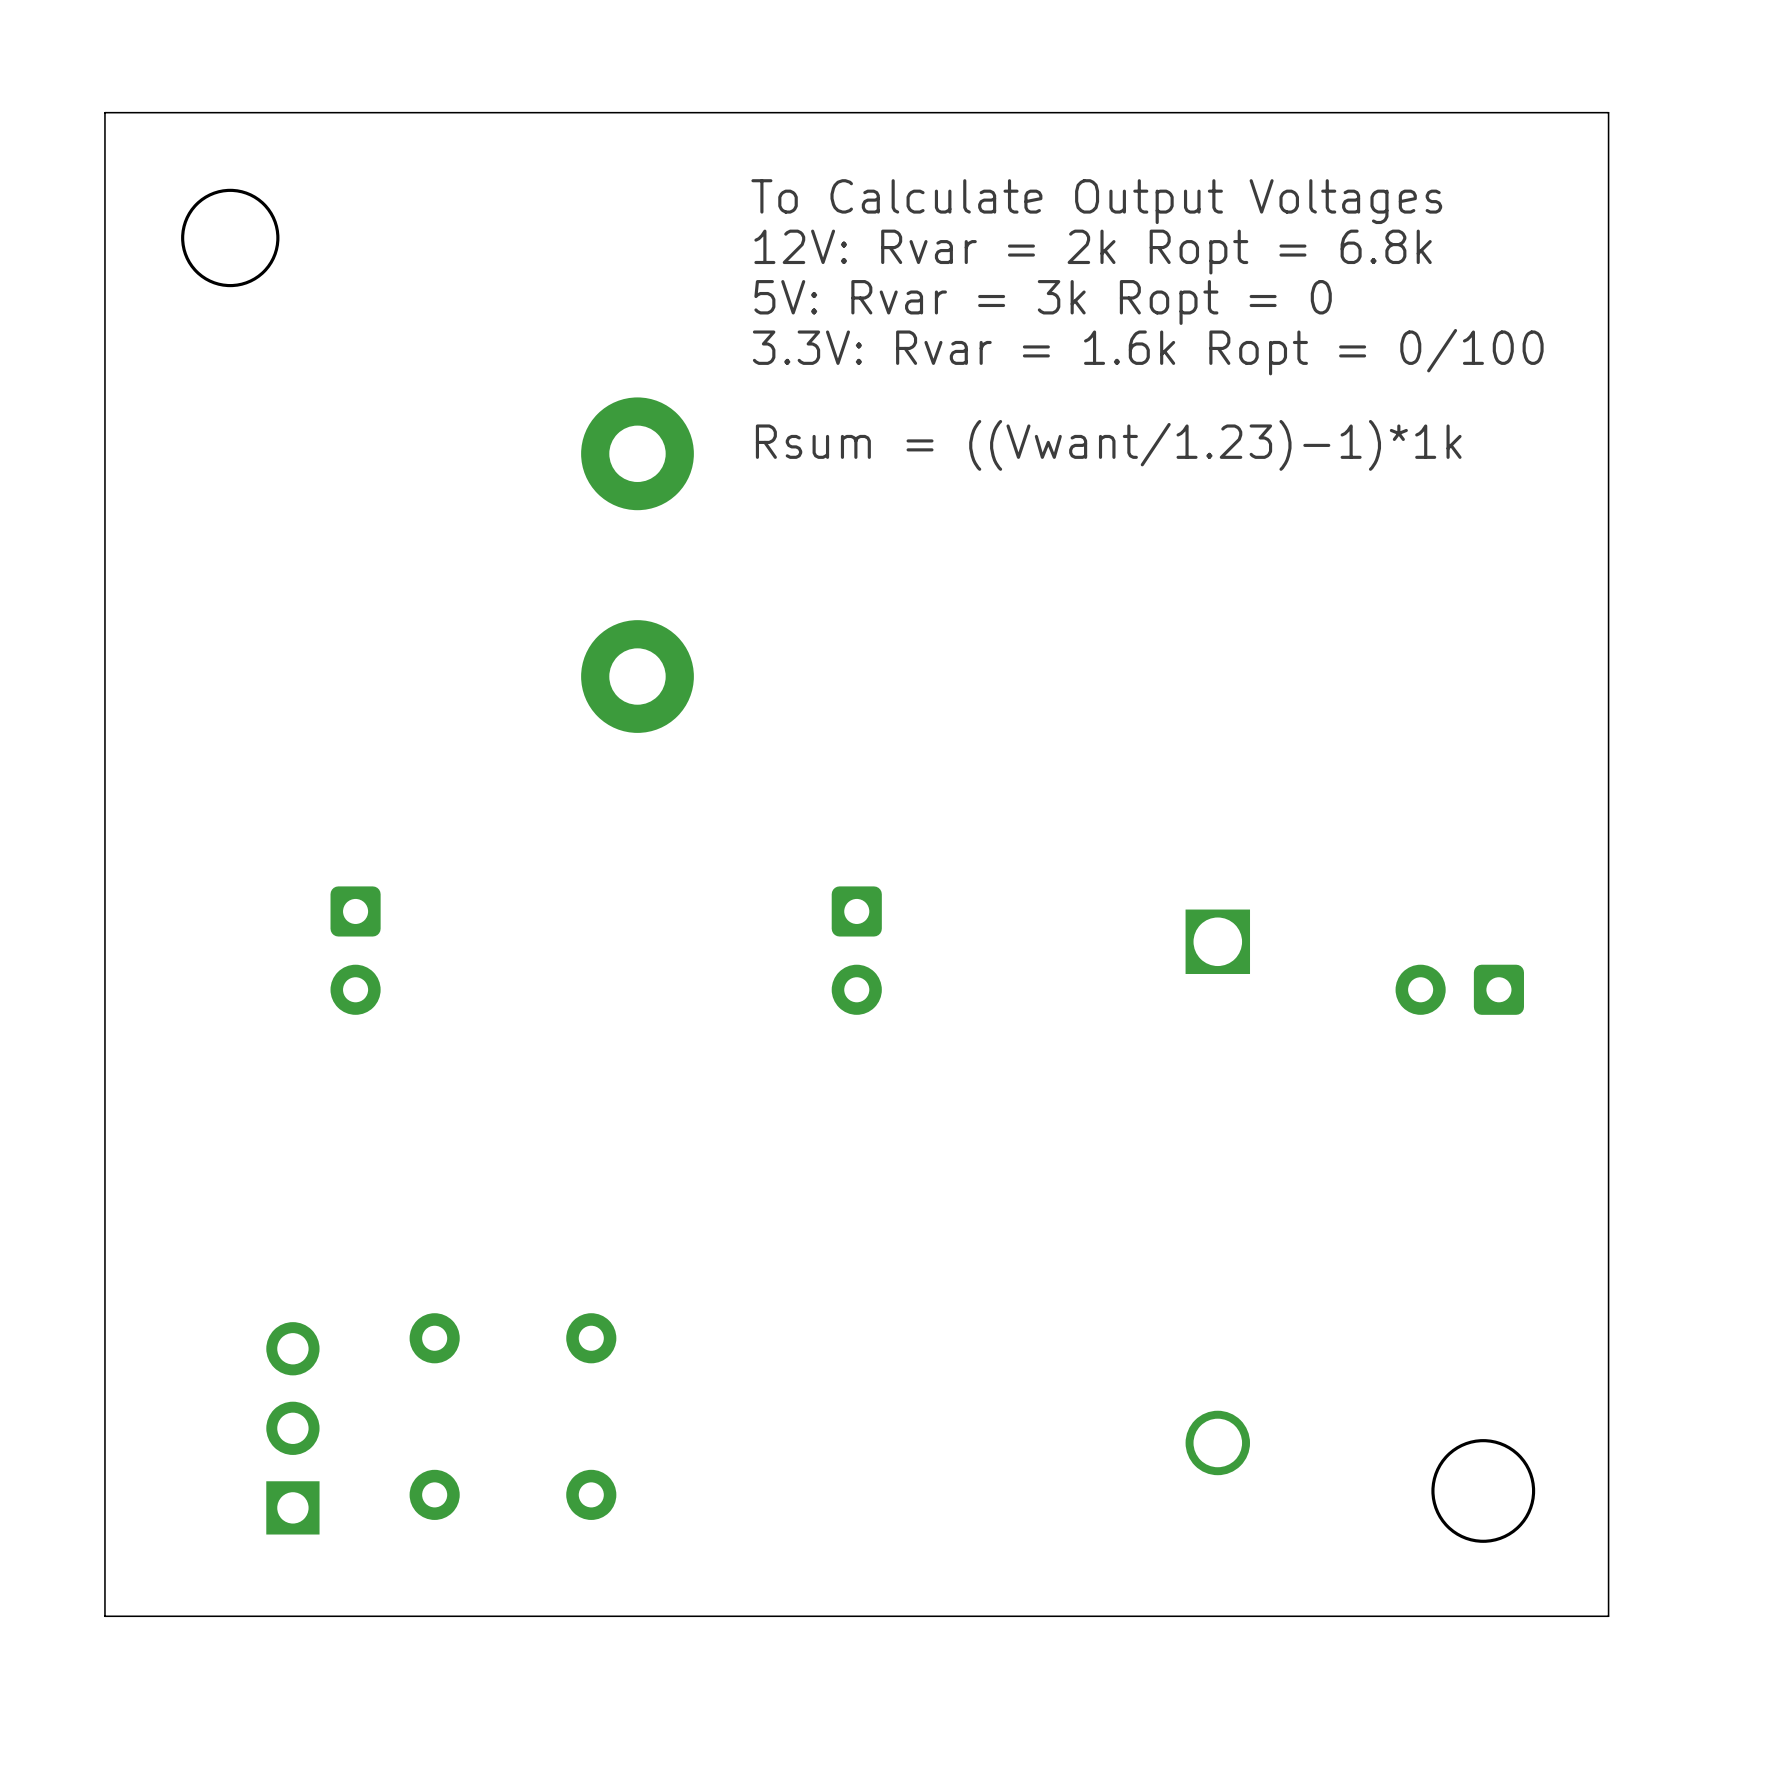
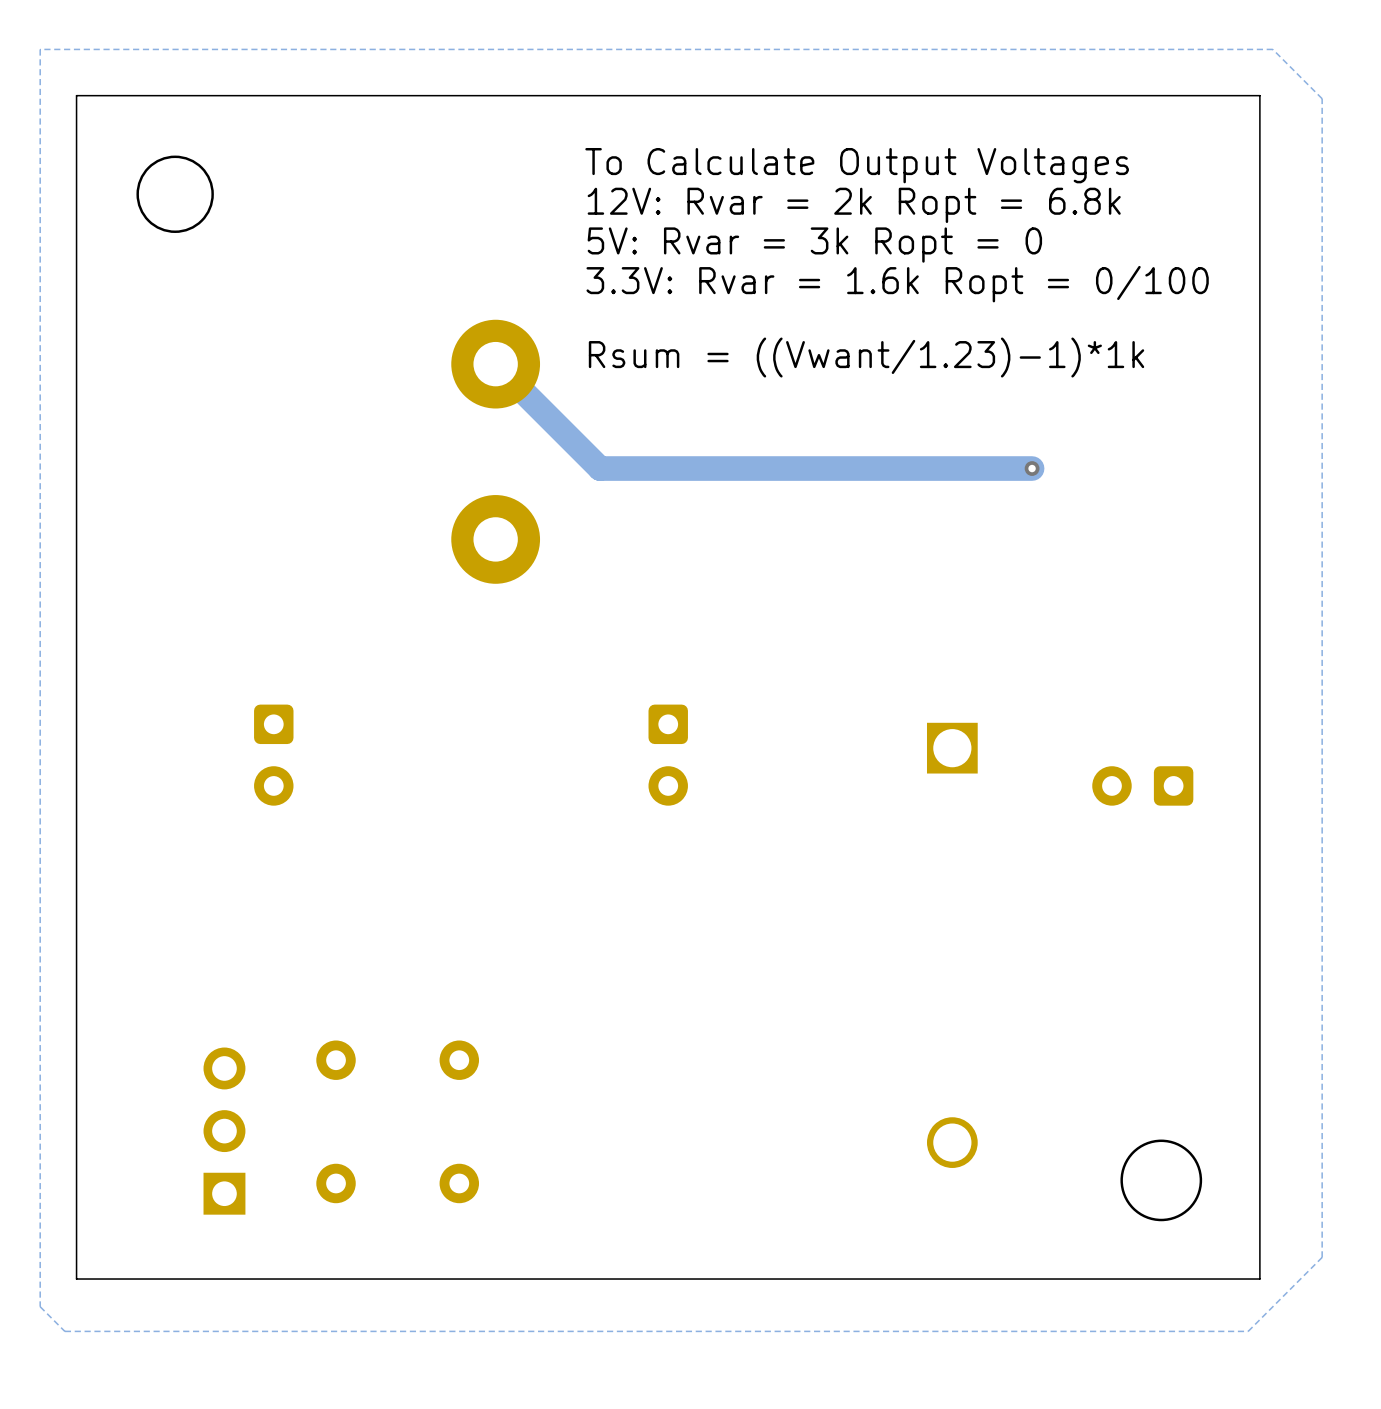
zone outline: none -> (1272, 49) (40, 49) (40, 1306) (64, 1331) (1248, 1331) (1322, 1257) (1322, 98) (1272, 49)
track: none -> (495, 364) (600, 468) (1032, 468)
via: none -> (1032, 468)

